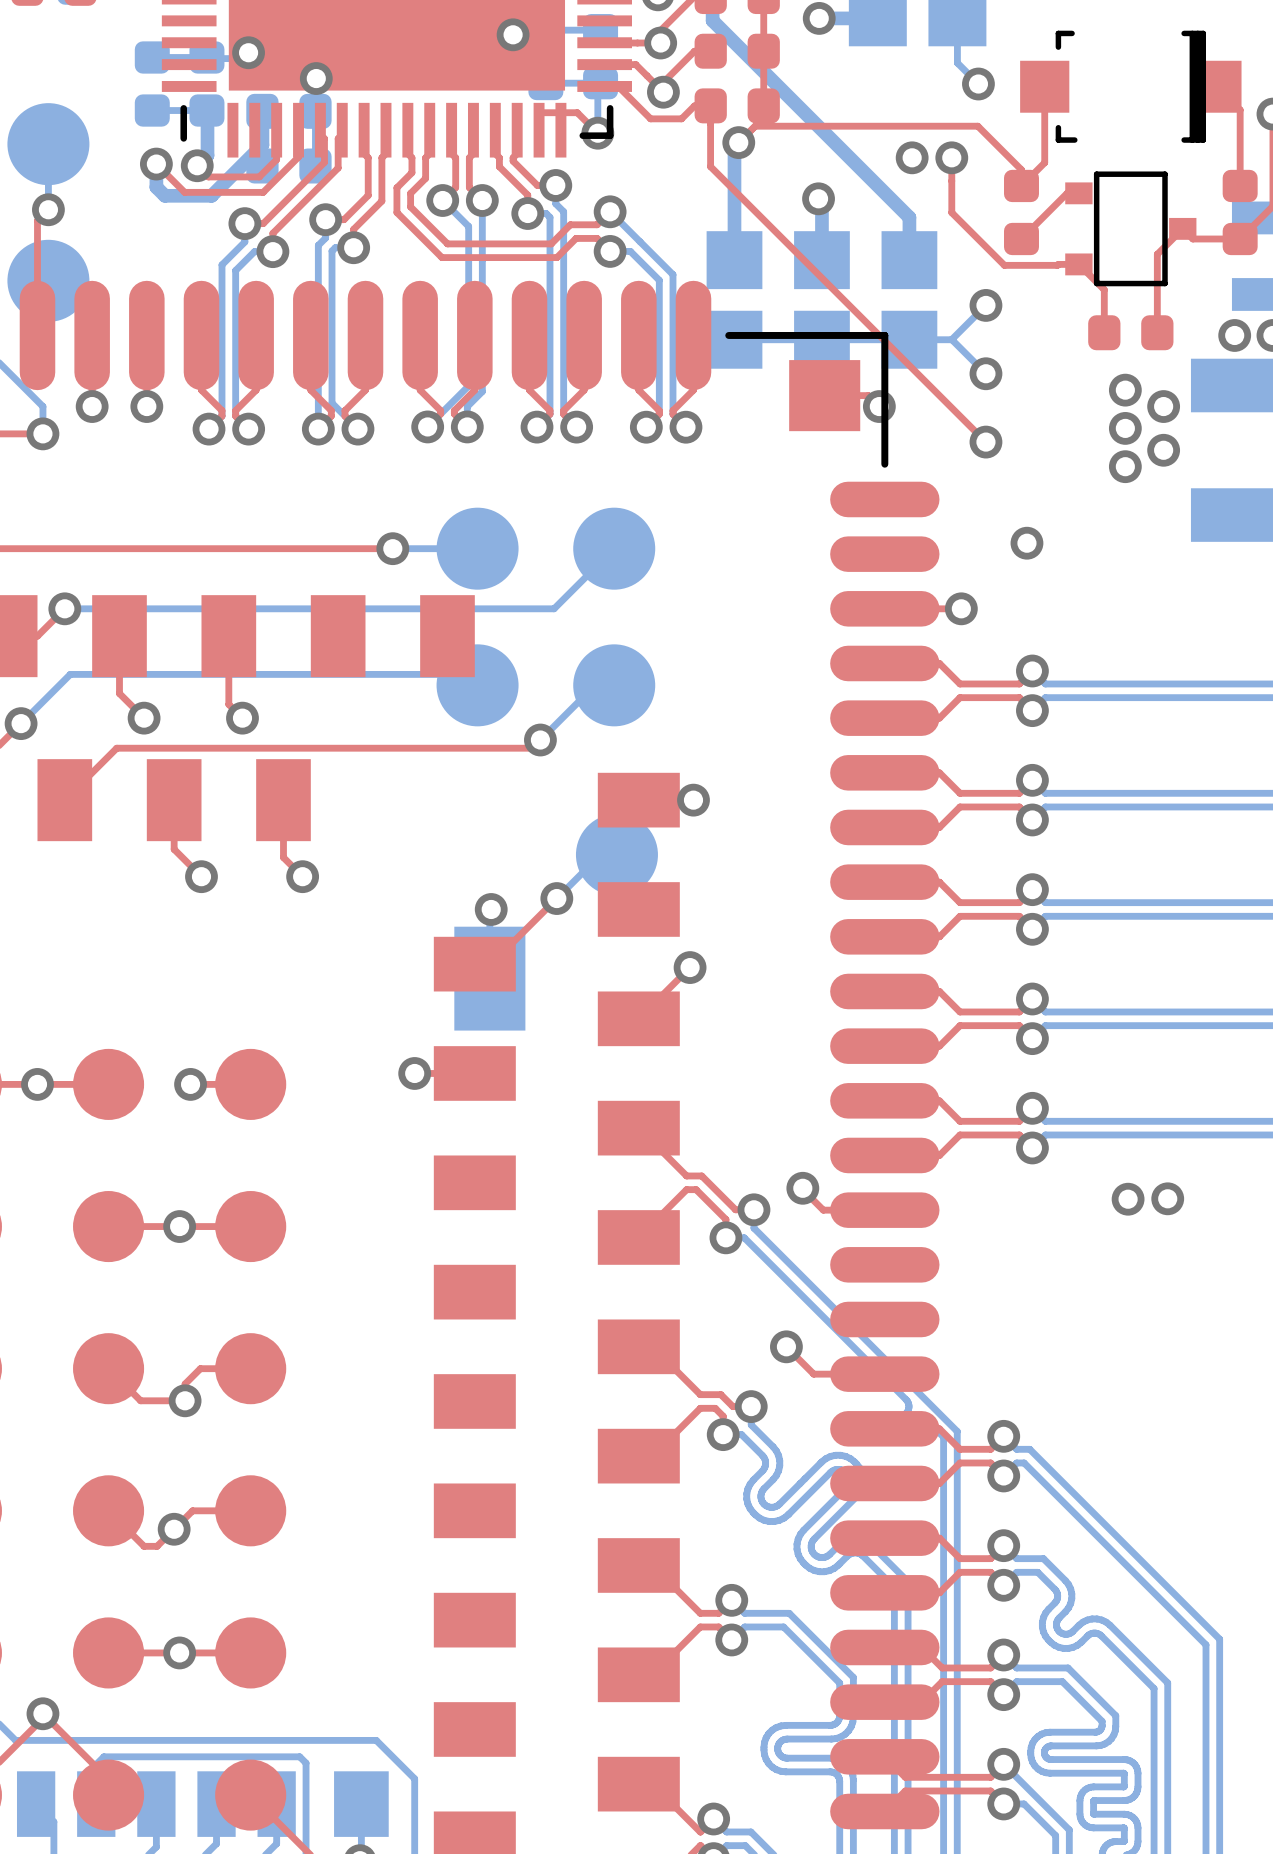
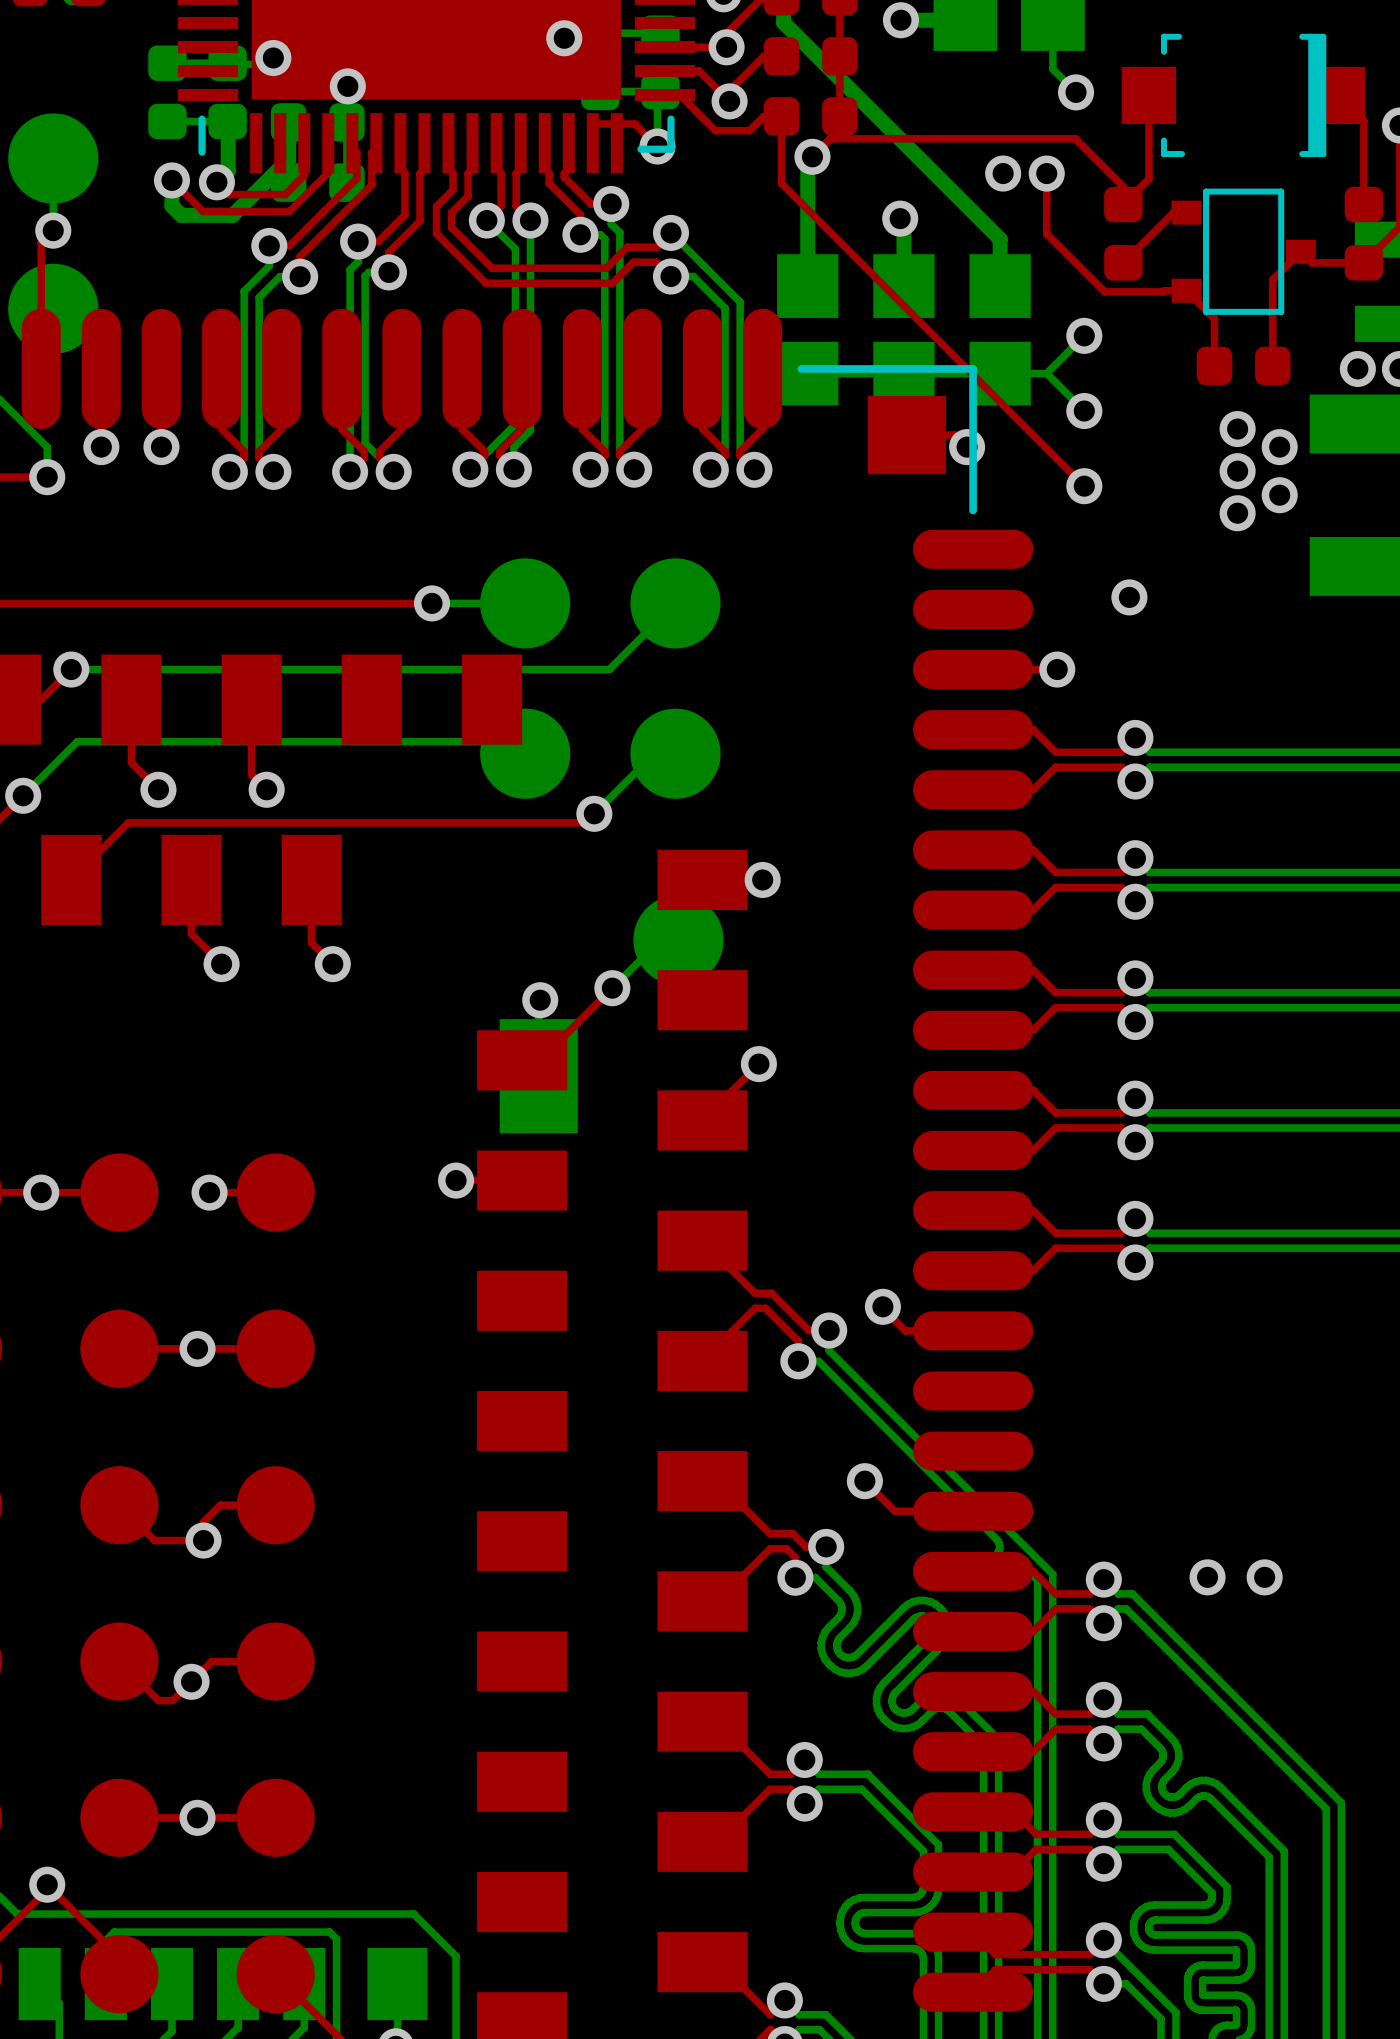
via: (1167, 1198) -> none
via: (1128, 1199) -> none
via: none -> (1207, 1577)
via: none -> (1264, 1577)

